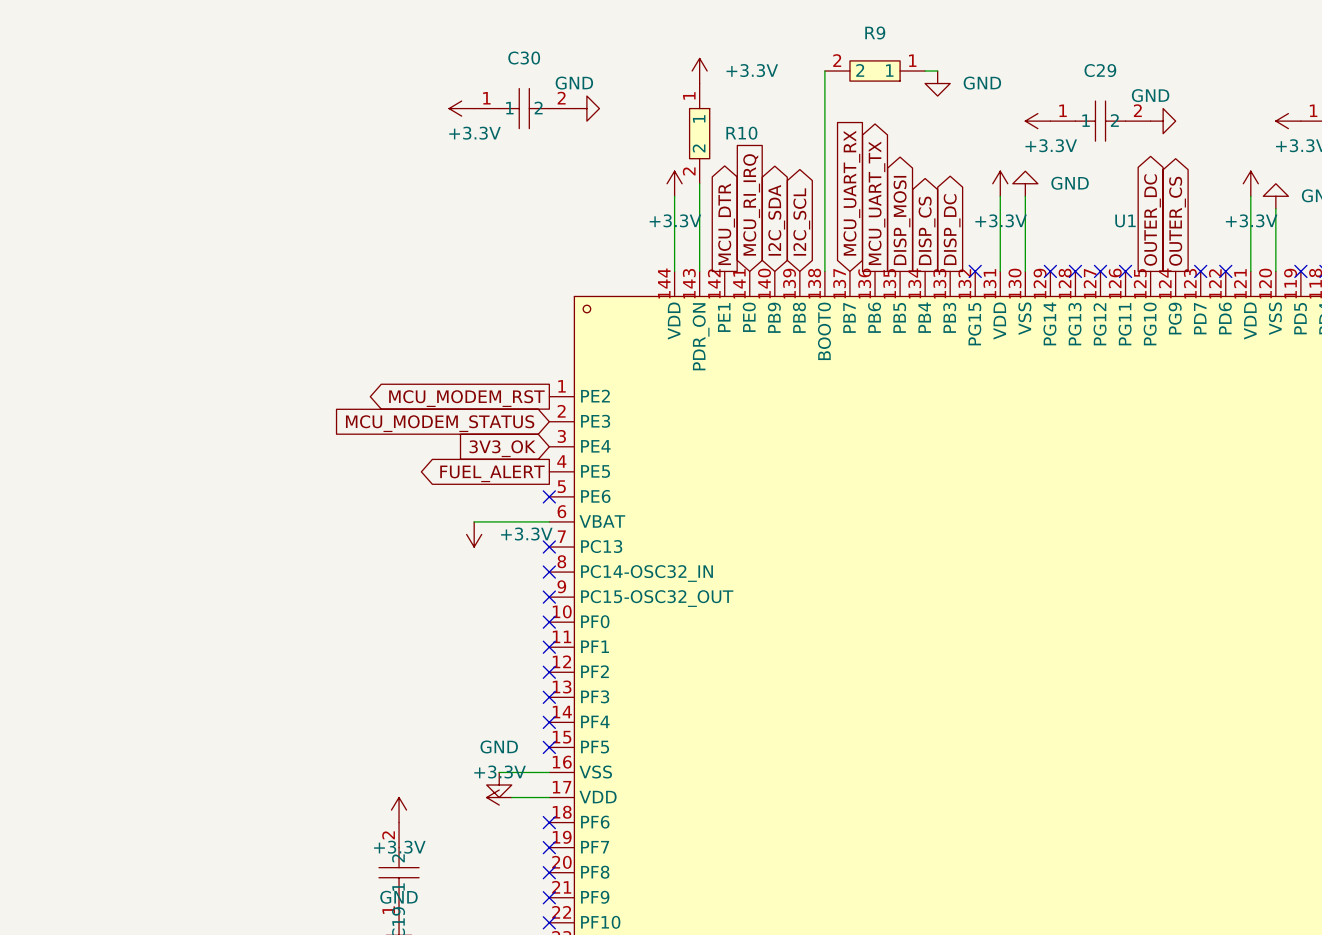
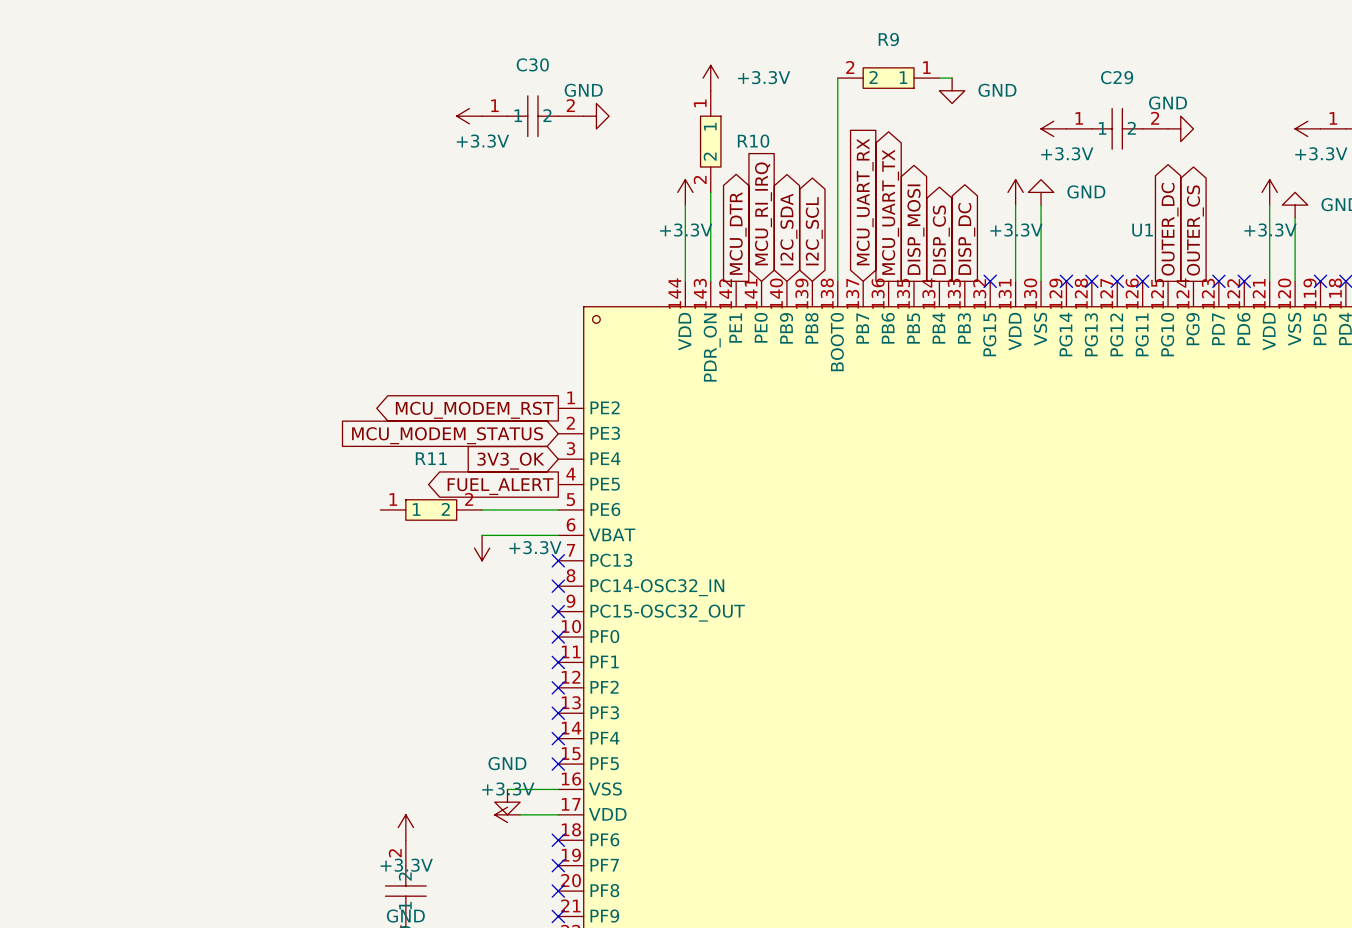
R11: none -> (431, 509)
wire: none -> (482, 509) (558, 509)
no-connect mark: (549, 496) -> none

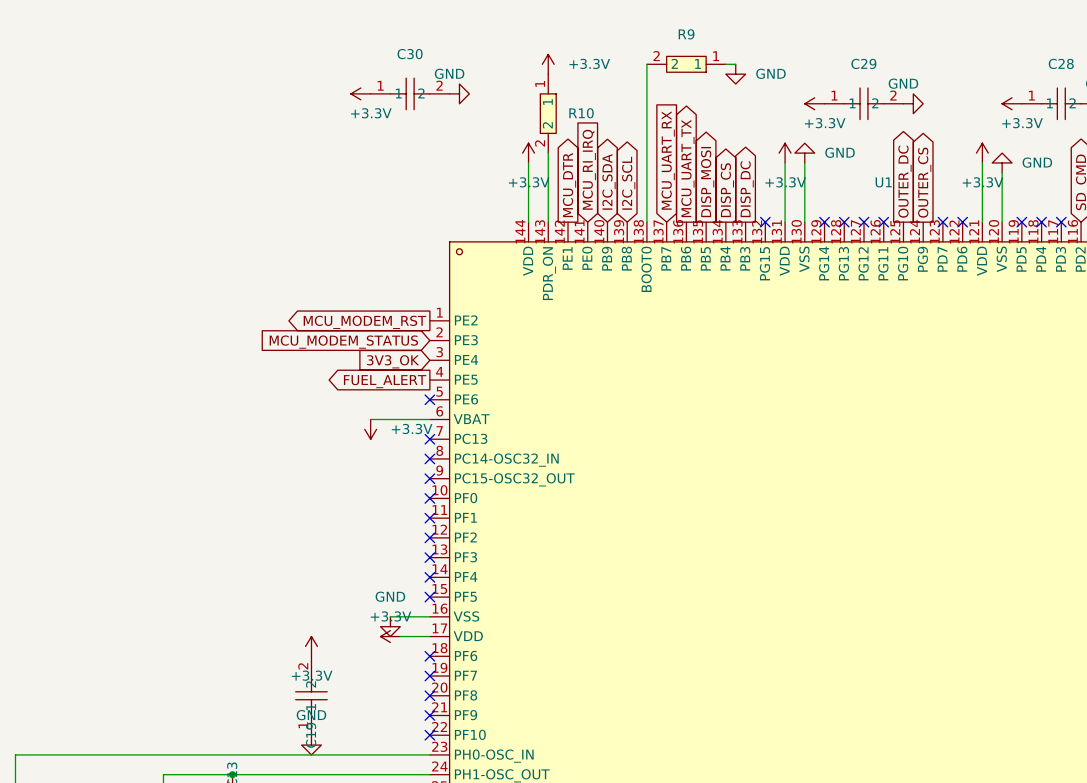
R11: (431, 509) -> none
wire: (482, 509) (558, 509) -> none
no-connect mark: none -> (429, 399)

